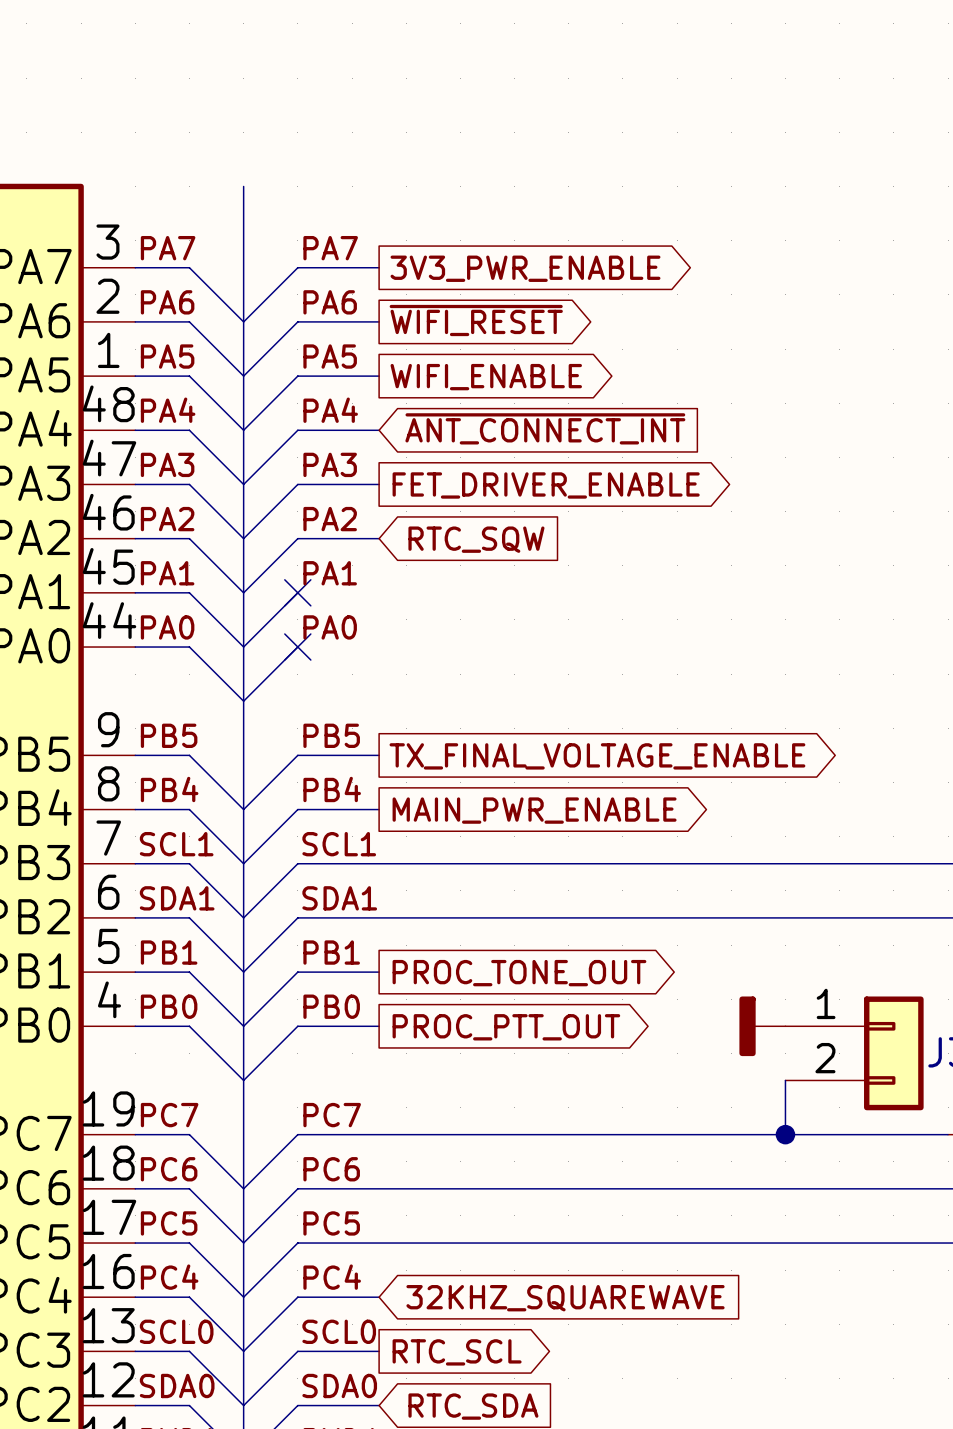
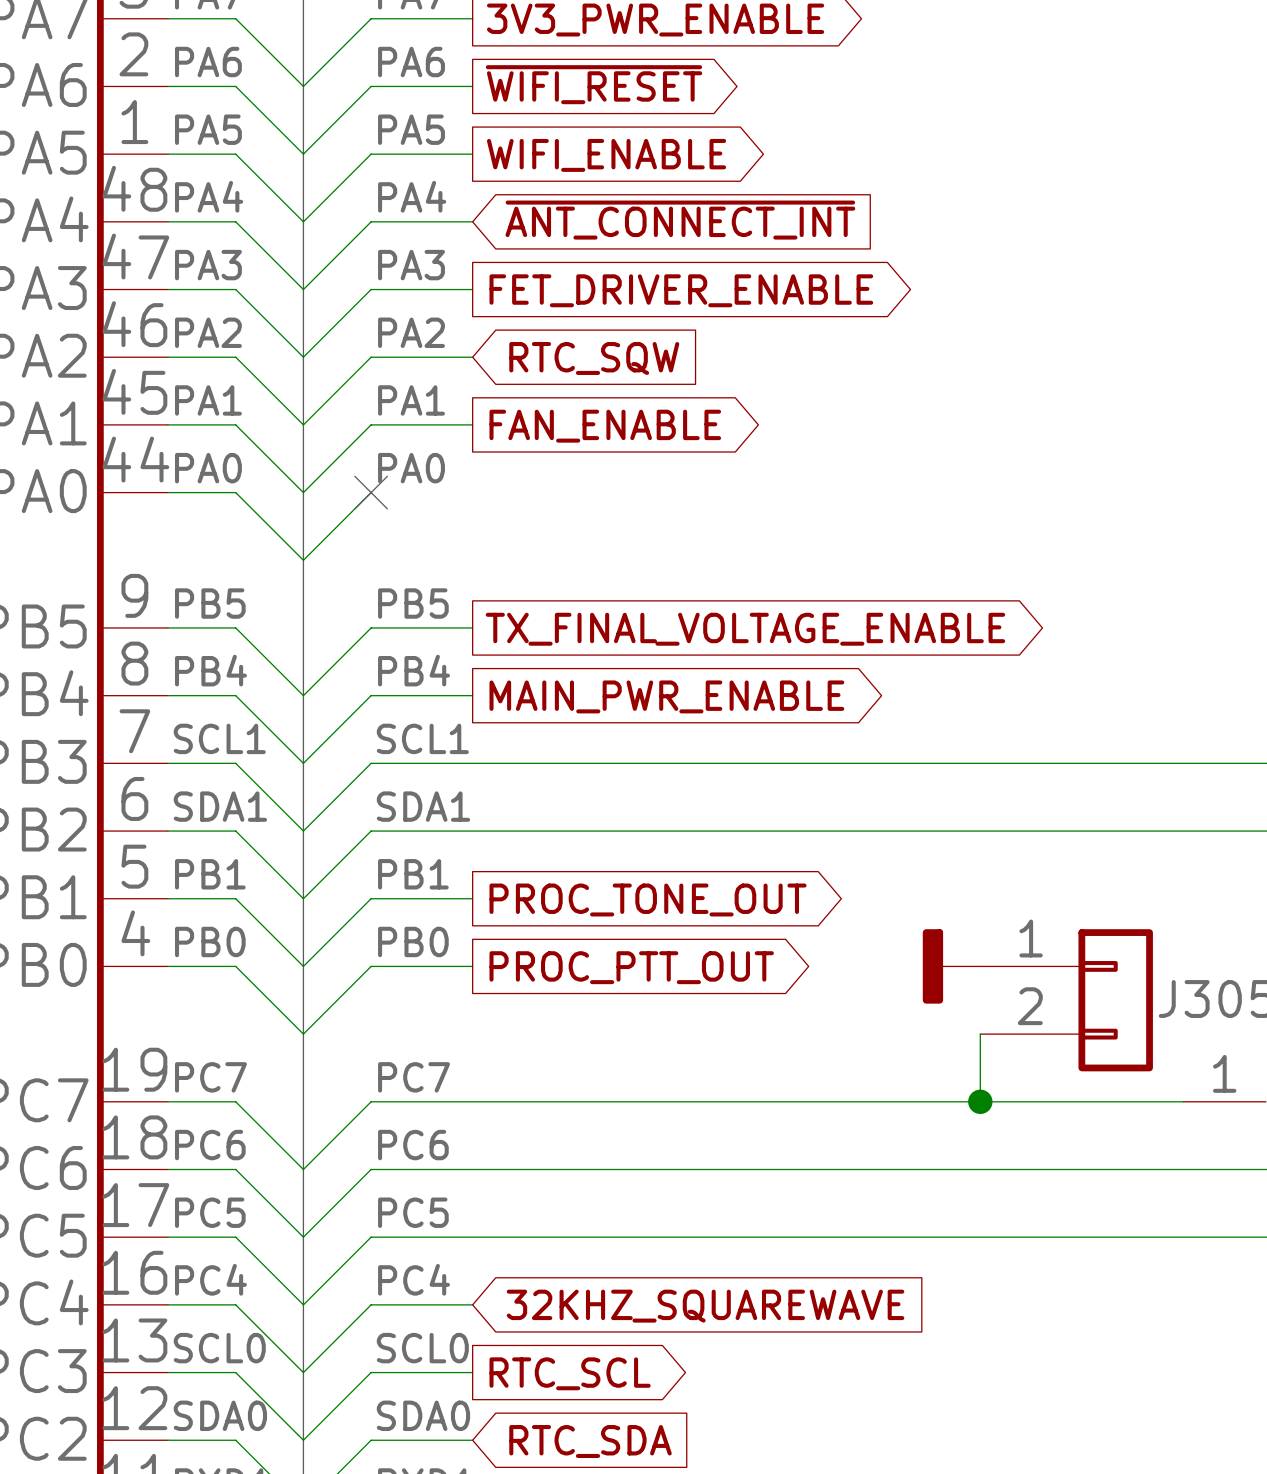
wire: none -> (371, 424) (472, 424)
no-connect mark: (297, 592) -> none
global label: none -> FAN_ENABLE (605, 426)

